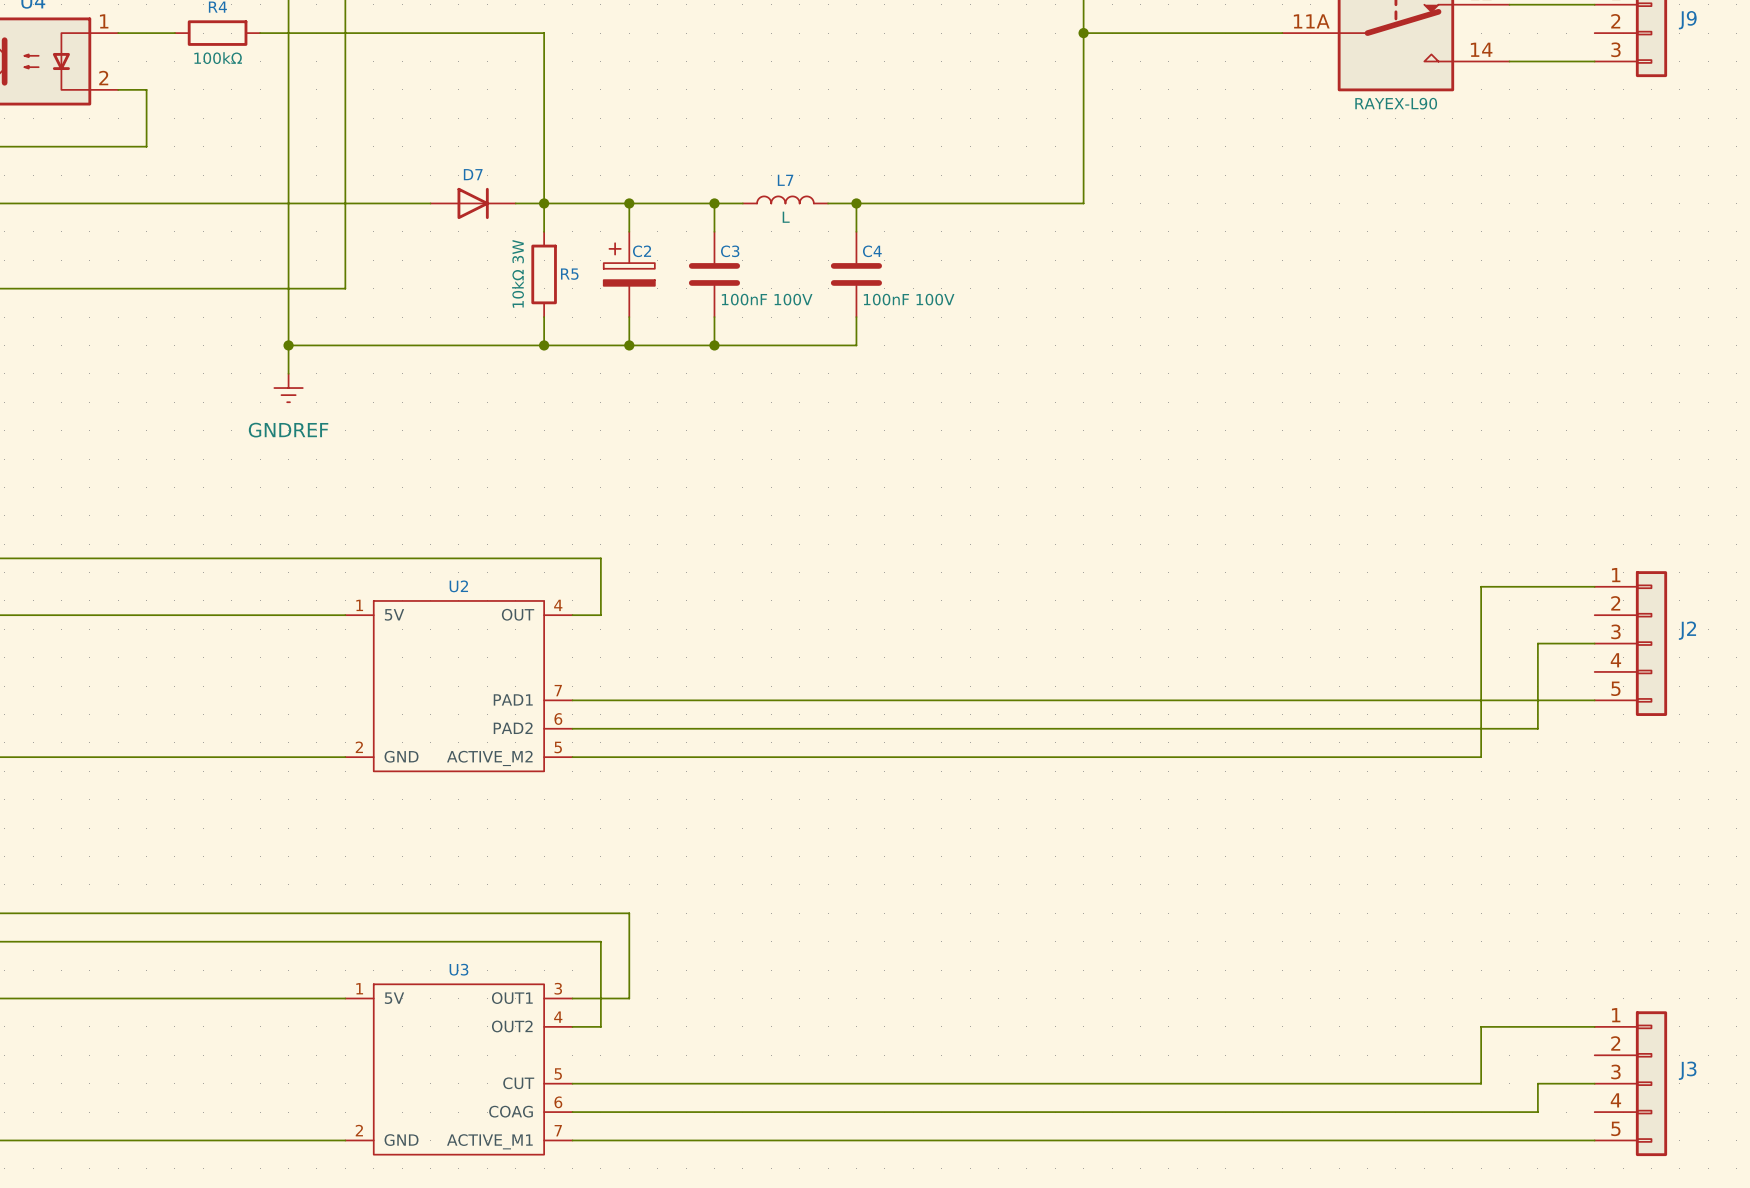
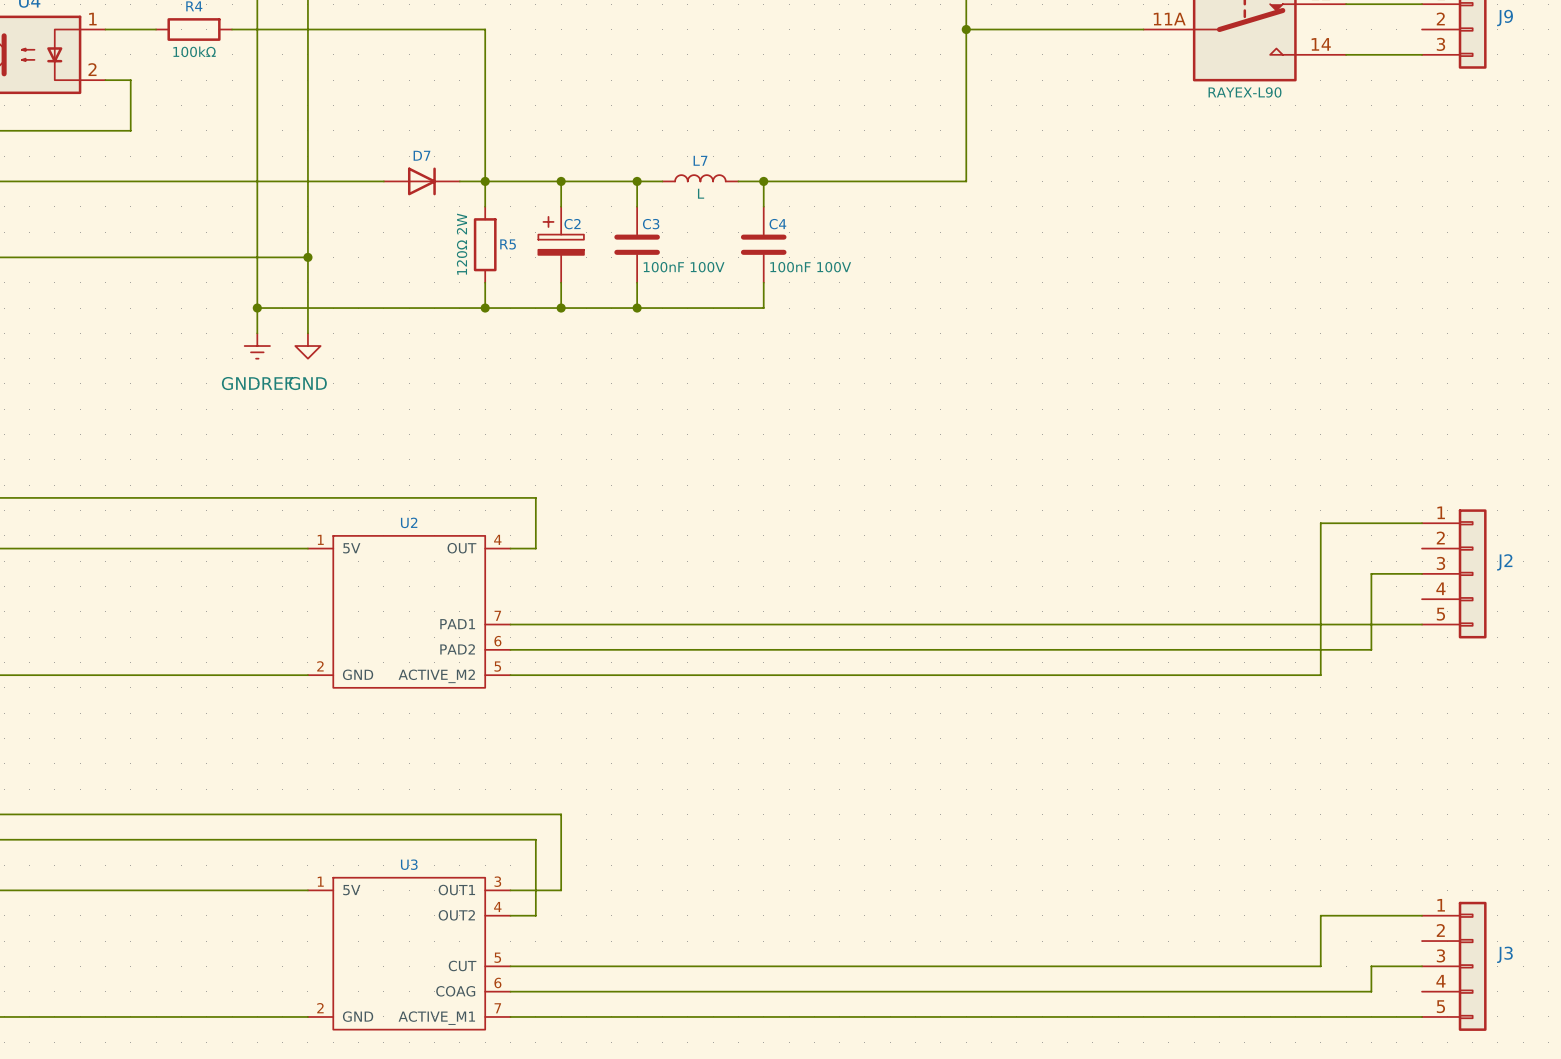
R5 value: 10kΩ 3W (518, 273) -> 120Ω 2W (462, 244)
wire: none -> (307, 257) (307, 333)
junction: none -> (307, 257)
power symbol: none -> GND (307, 346)

